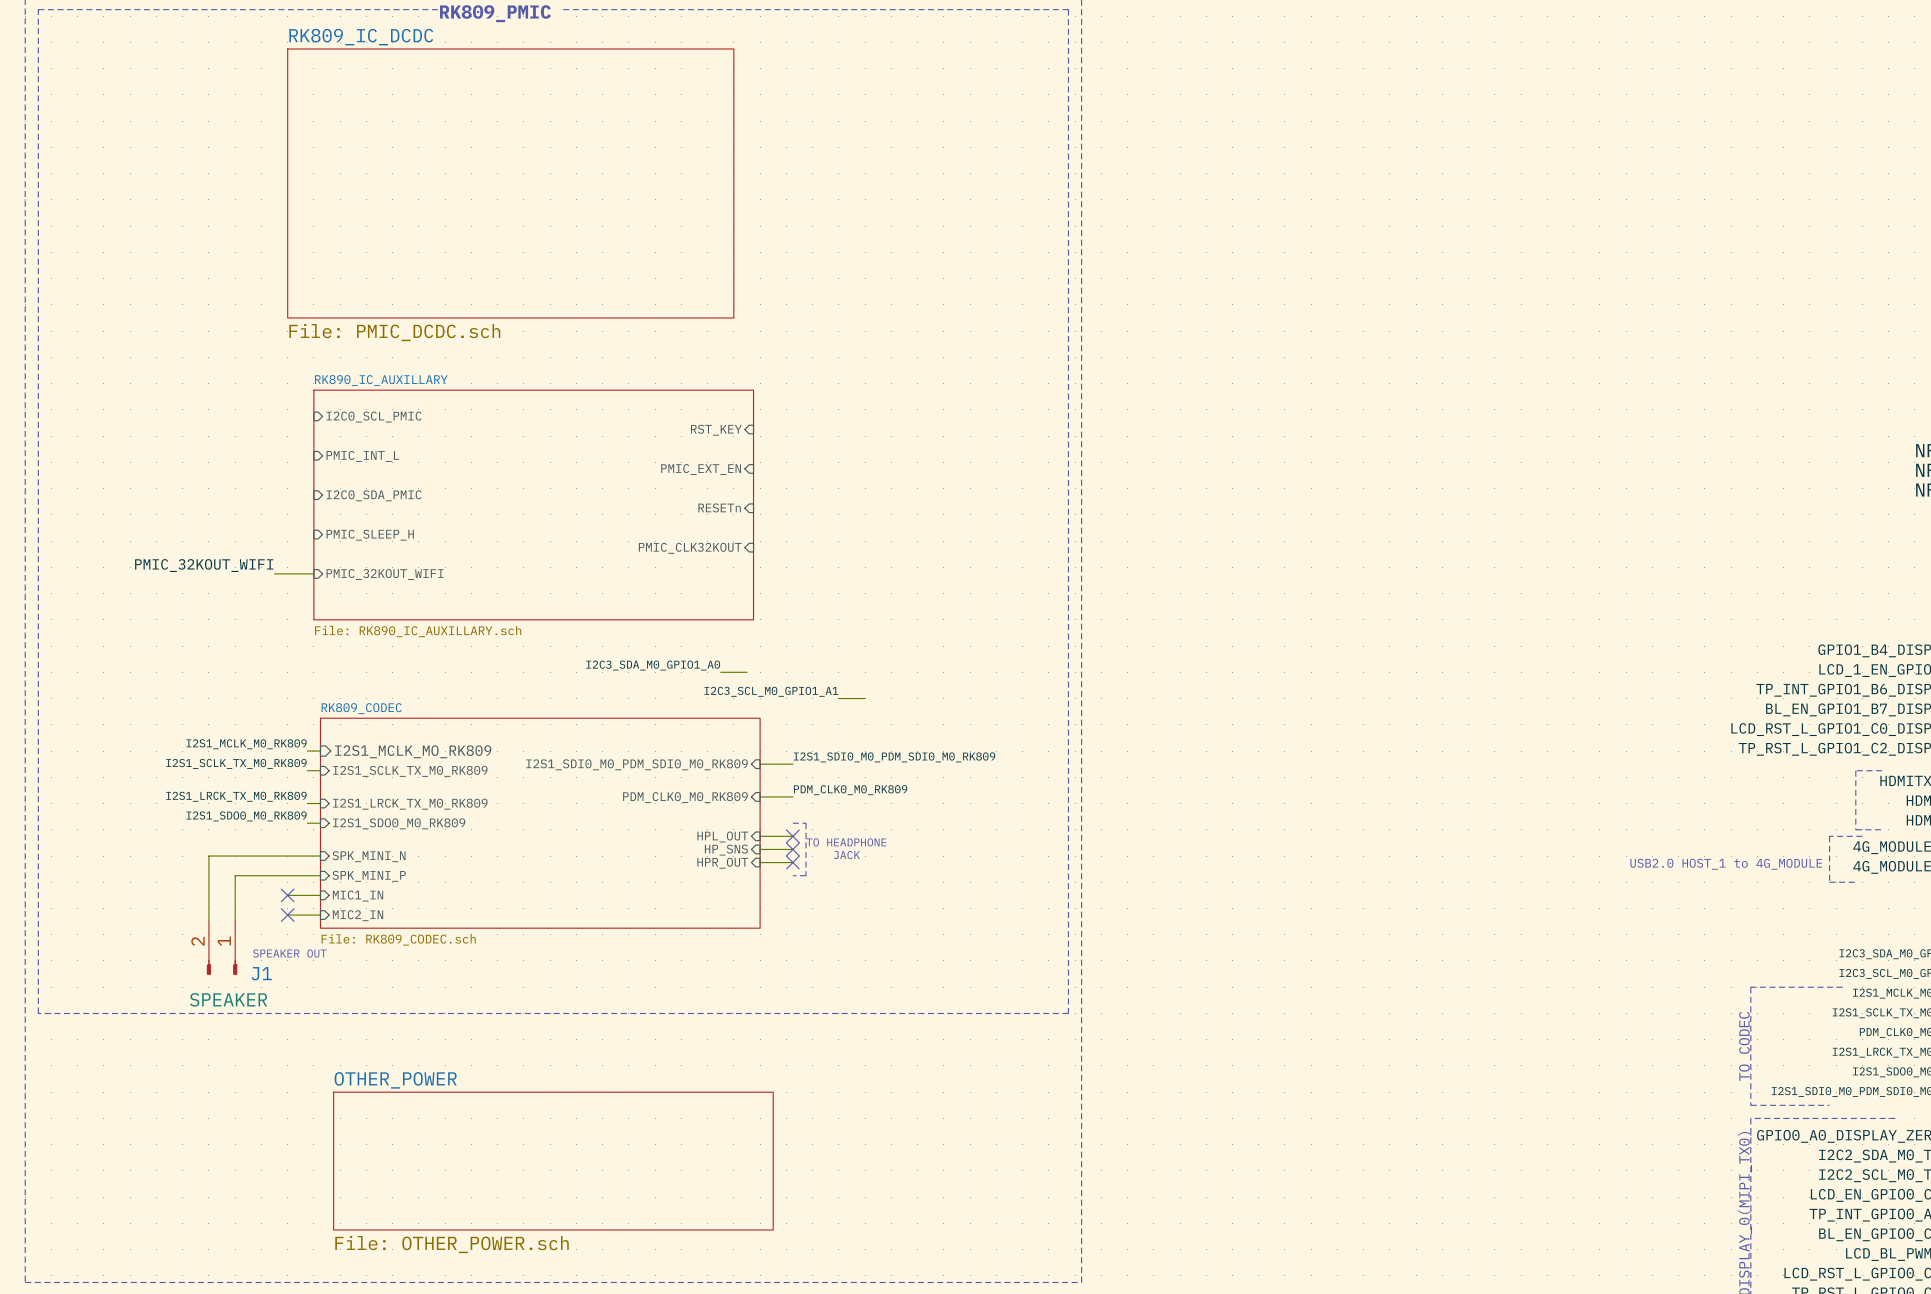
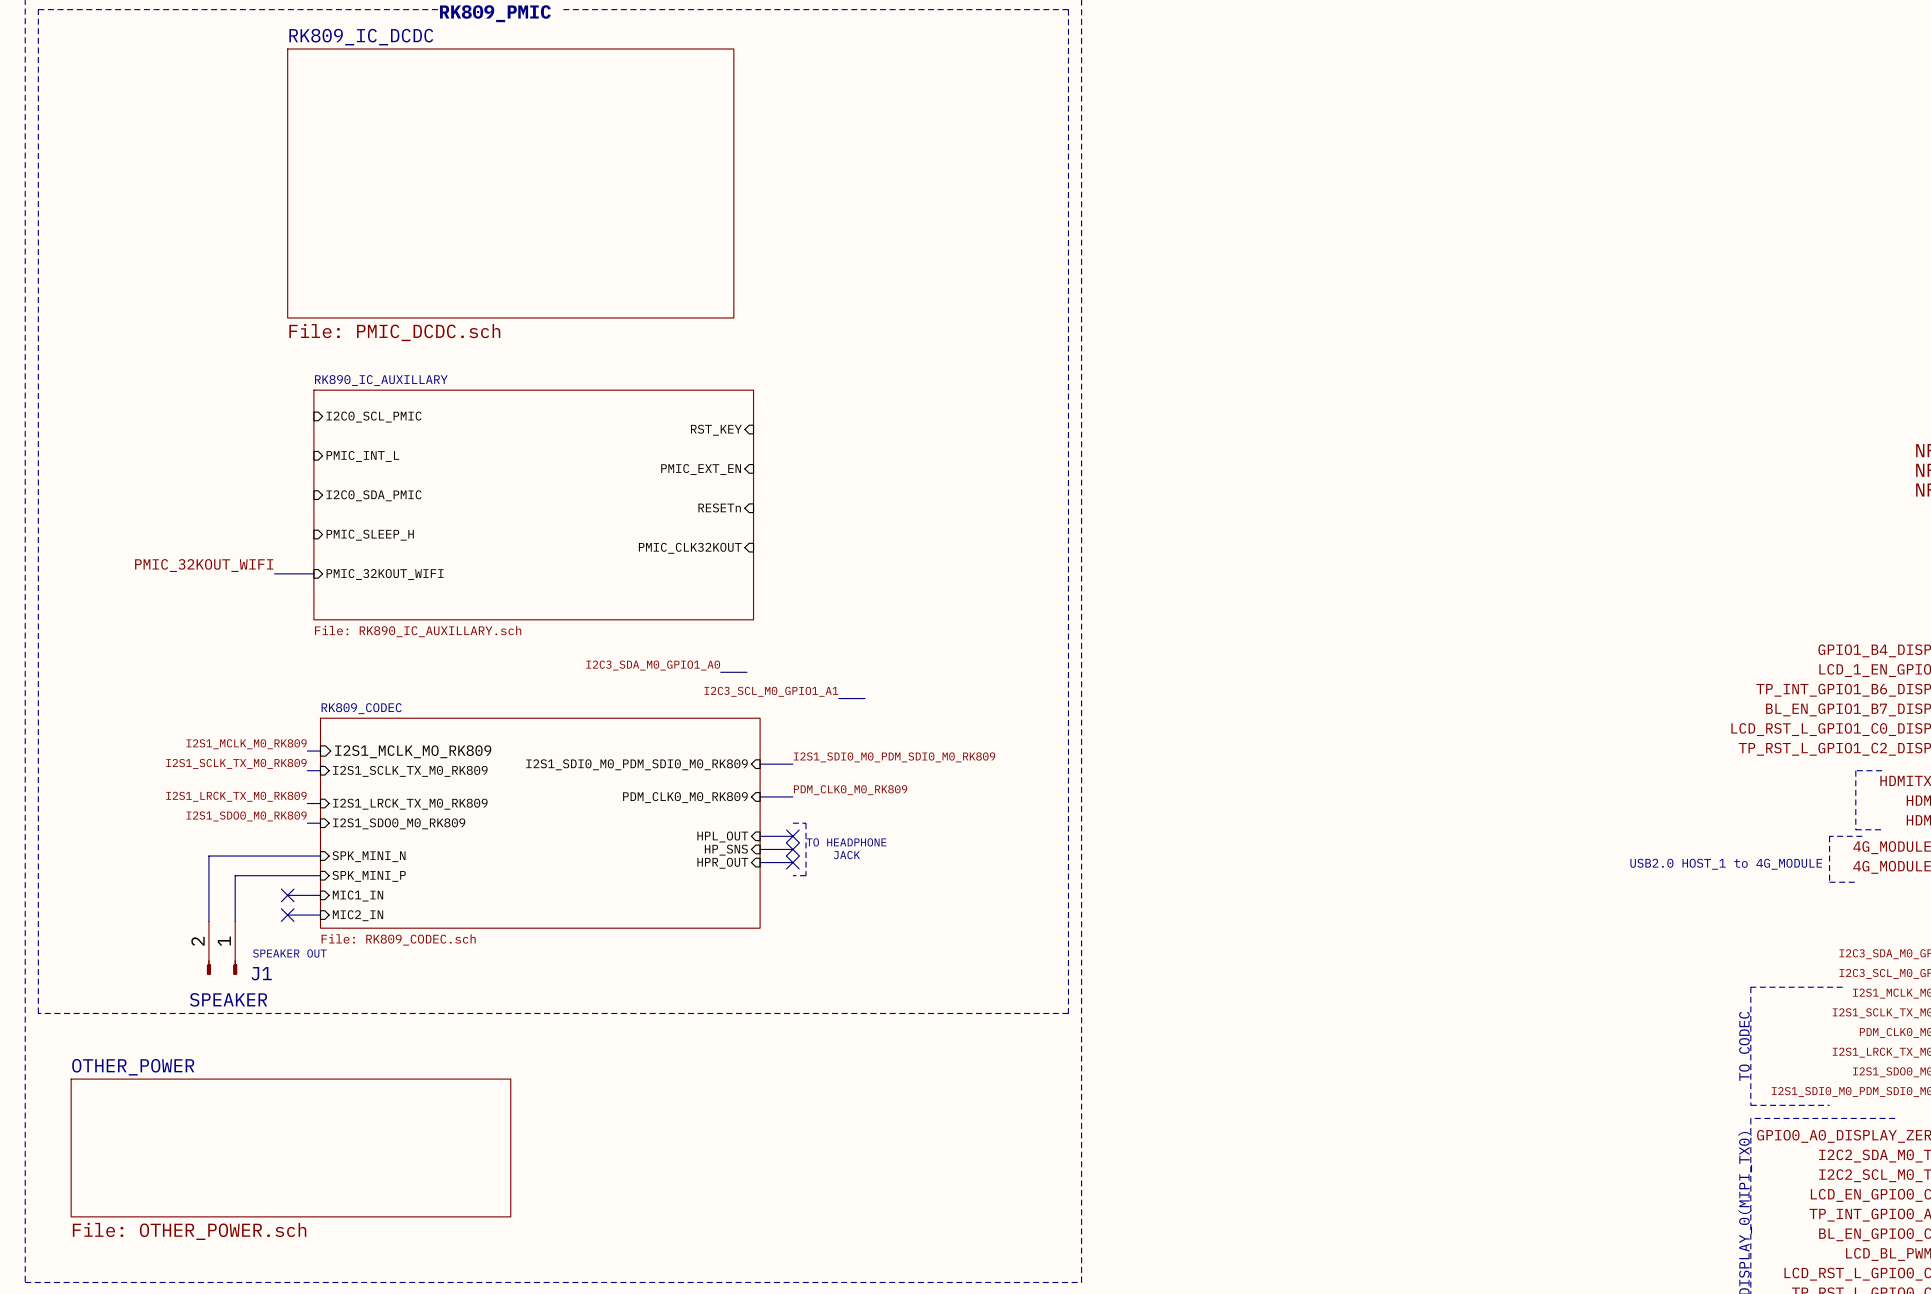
sheet OTHER_POWER: none -> File: OTHER_POWER.sch (290, 1147)
sheet OTHER_POWER: File: OTHER_POWER.sch (553, 1161) -> none

